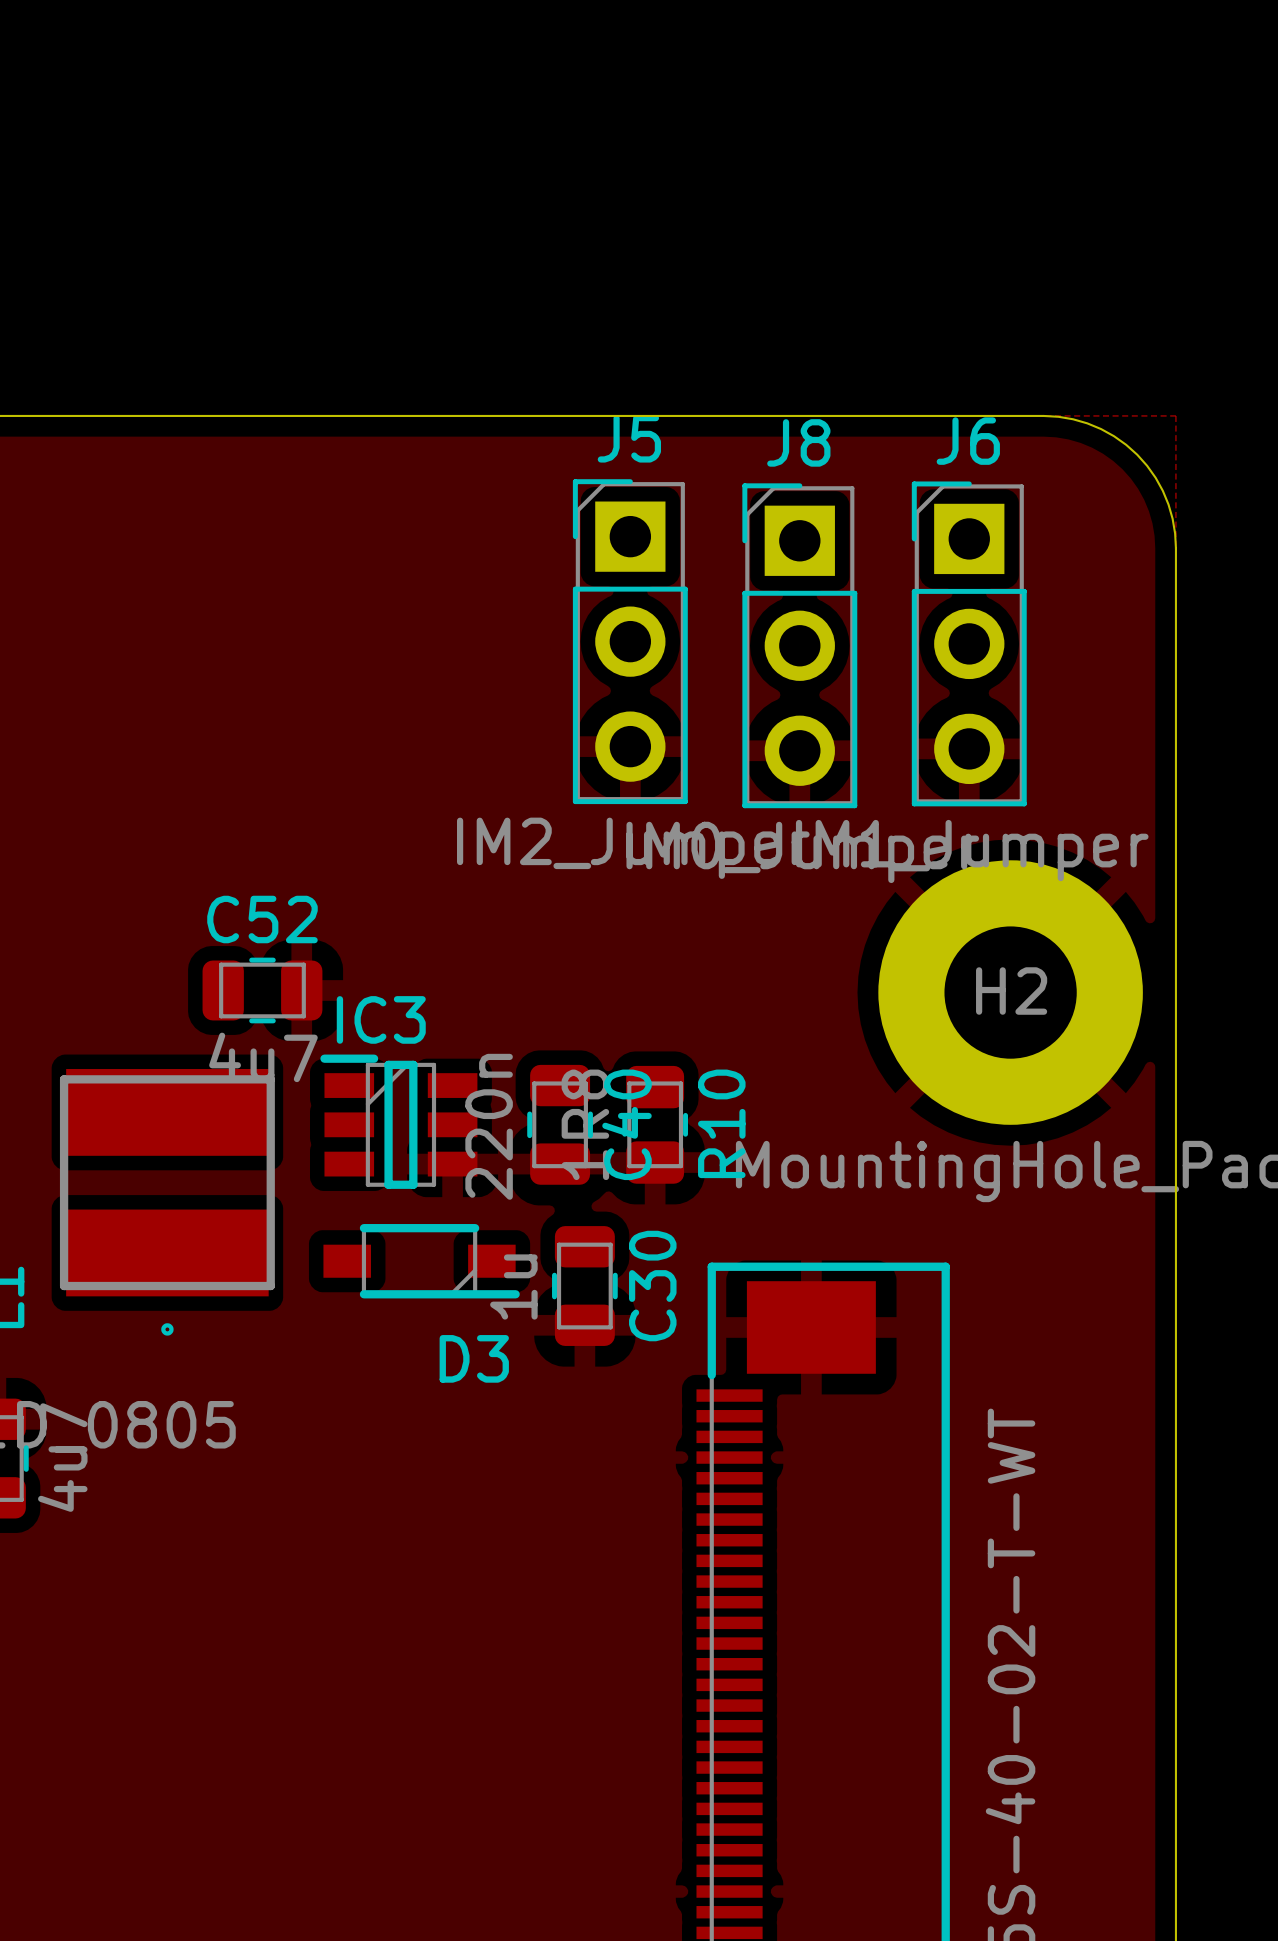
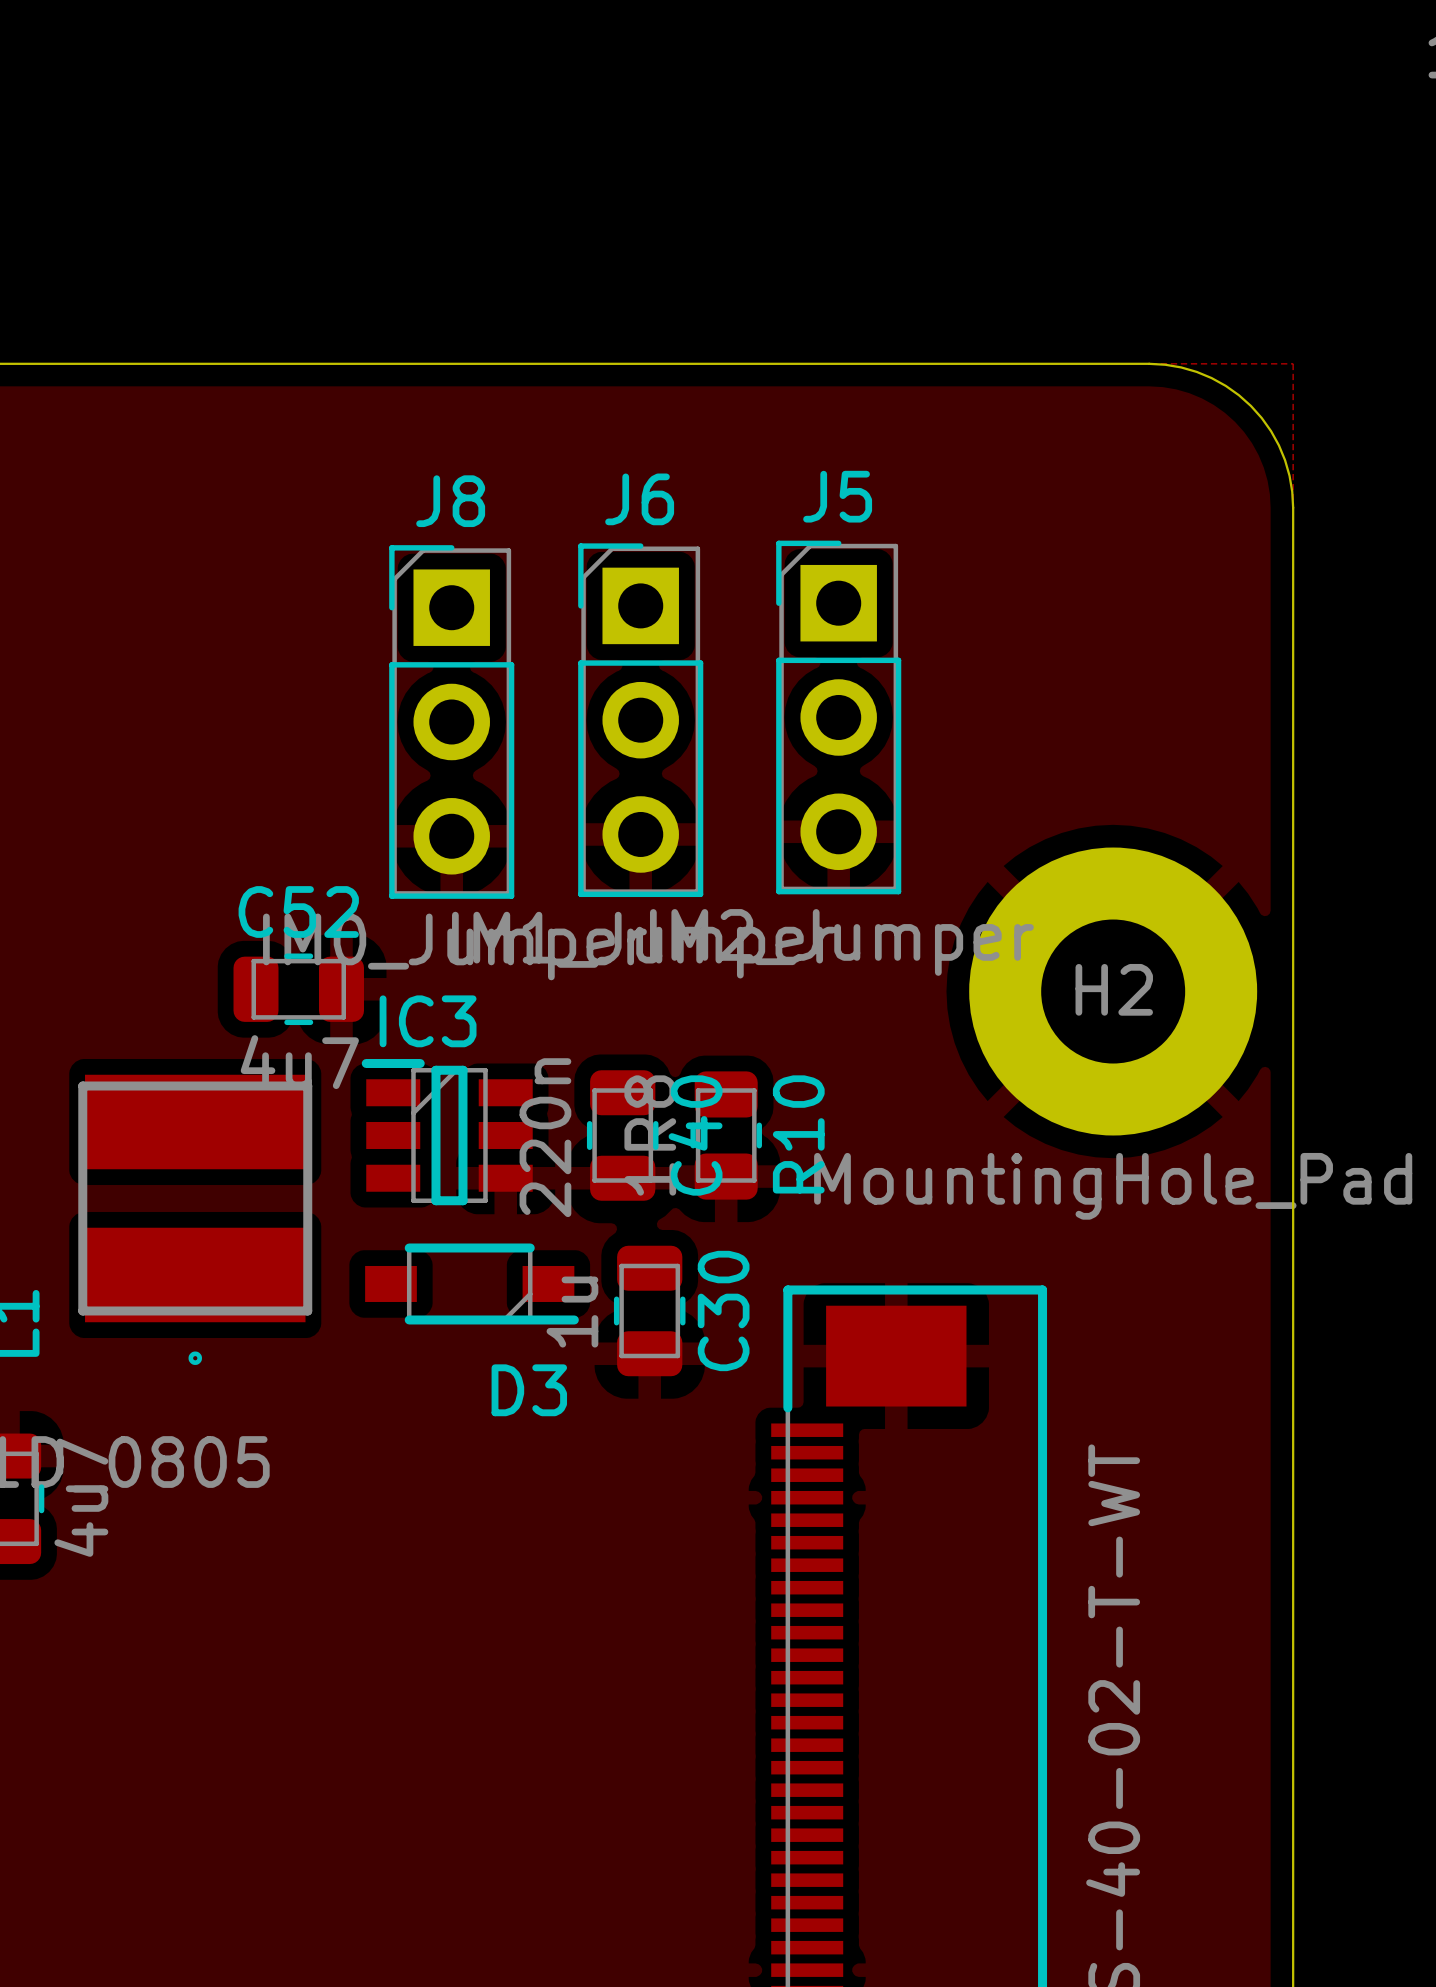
J5 position: (630, 641) -> (838, 717)
J6 position: (969, 643) -> (640, 720)
J8 position: (799, 645) -> (451, 721)

